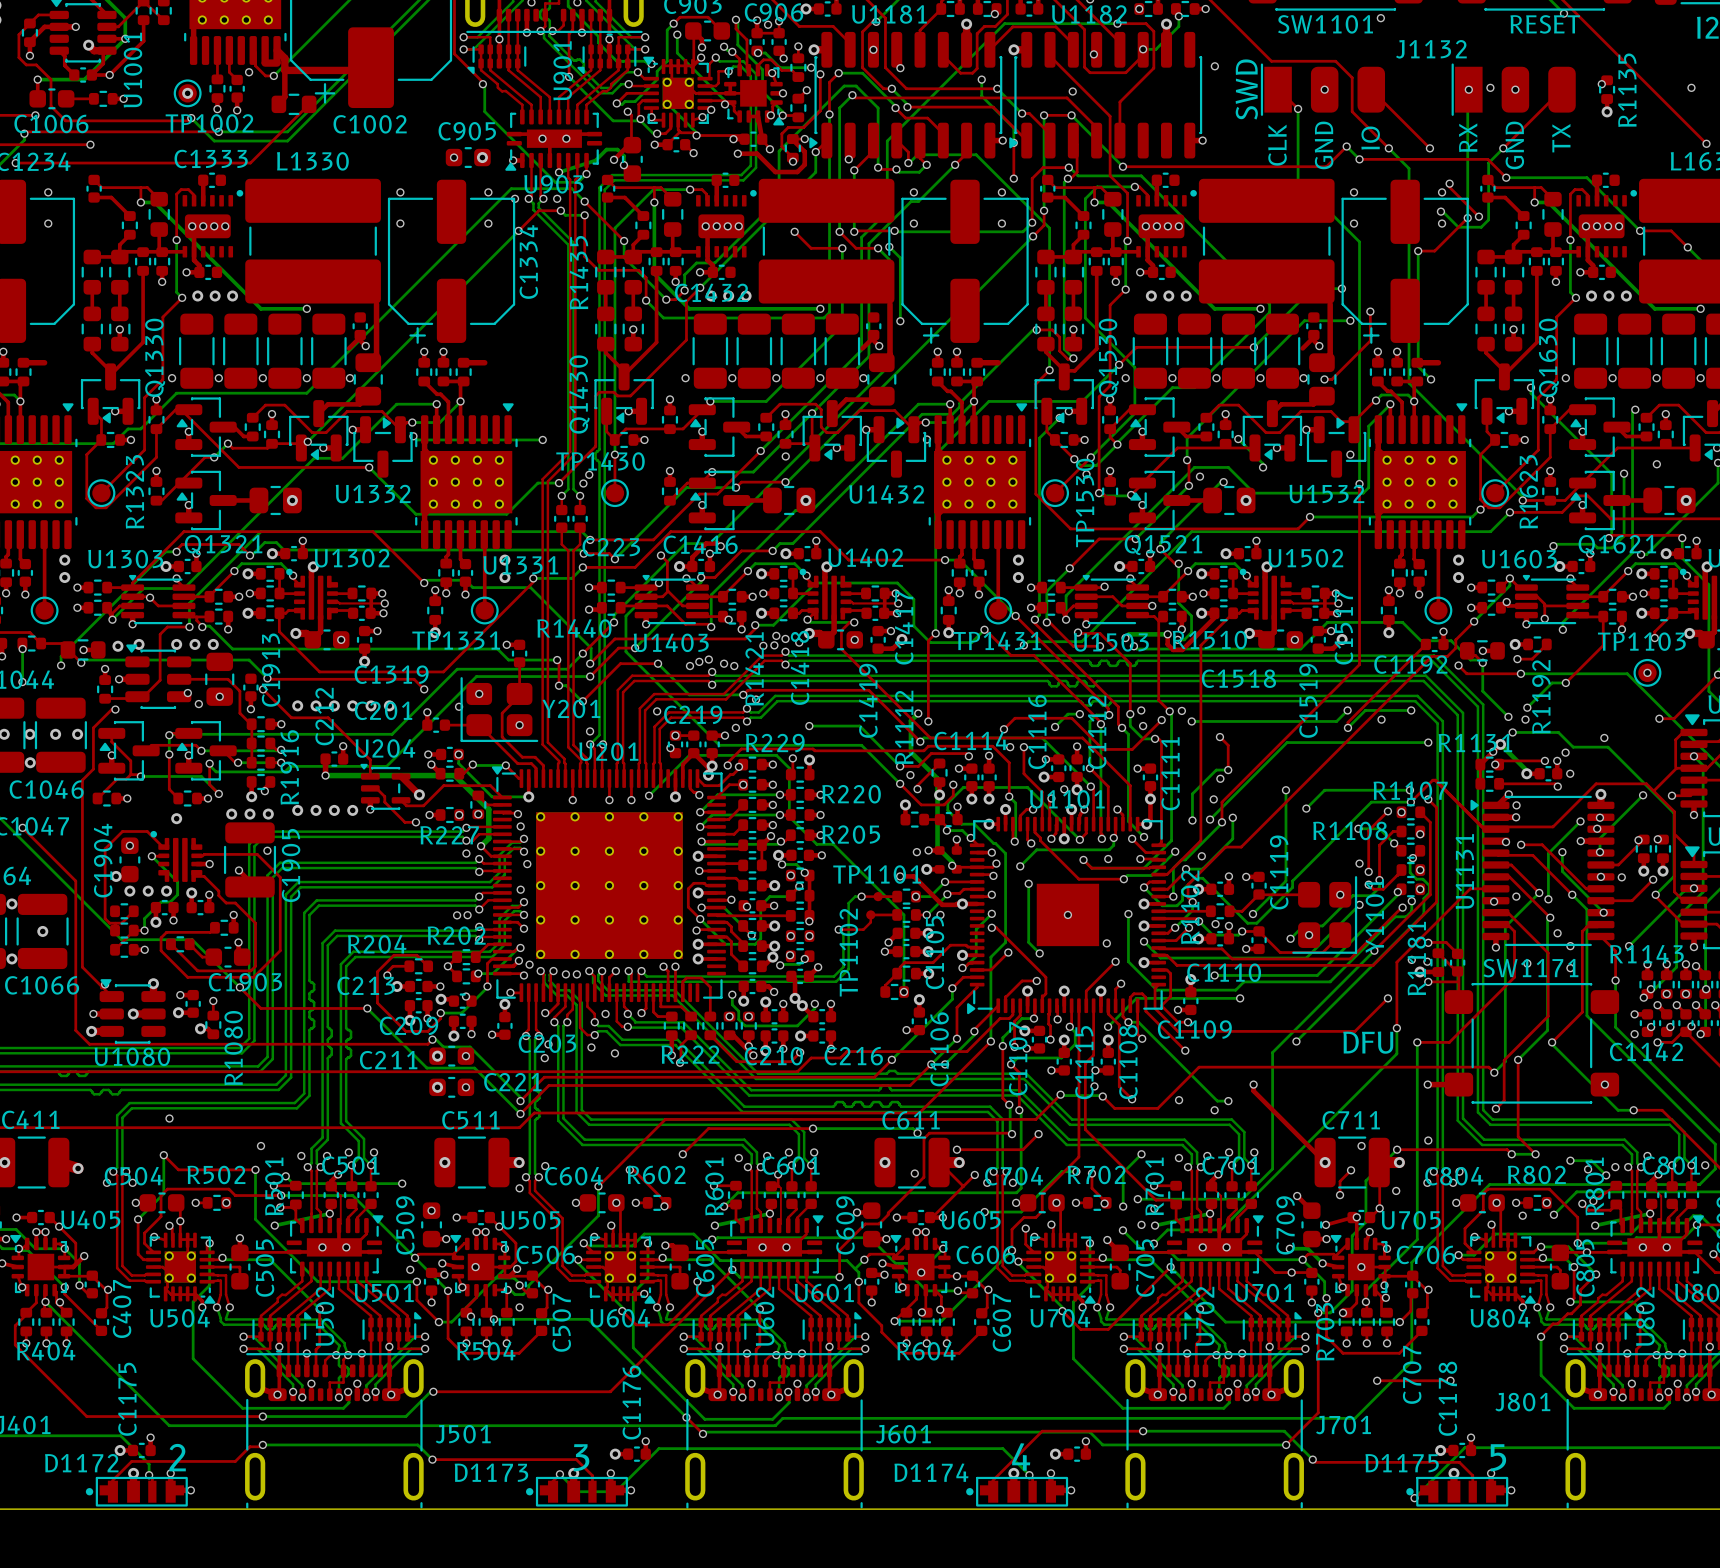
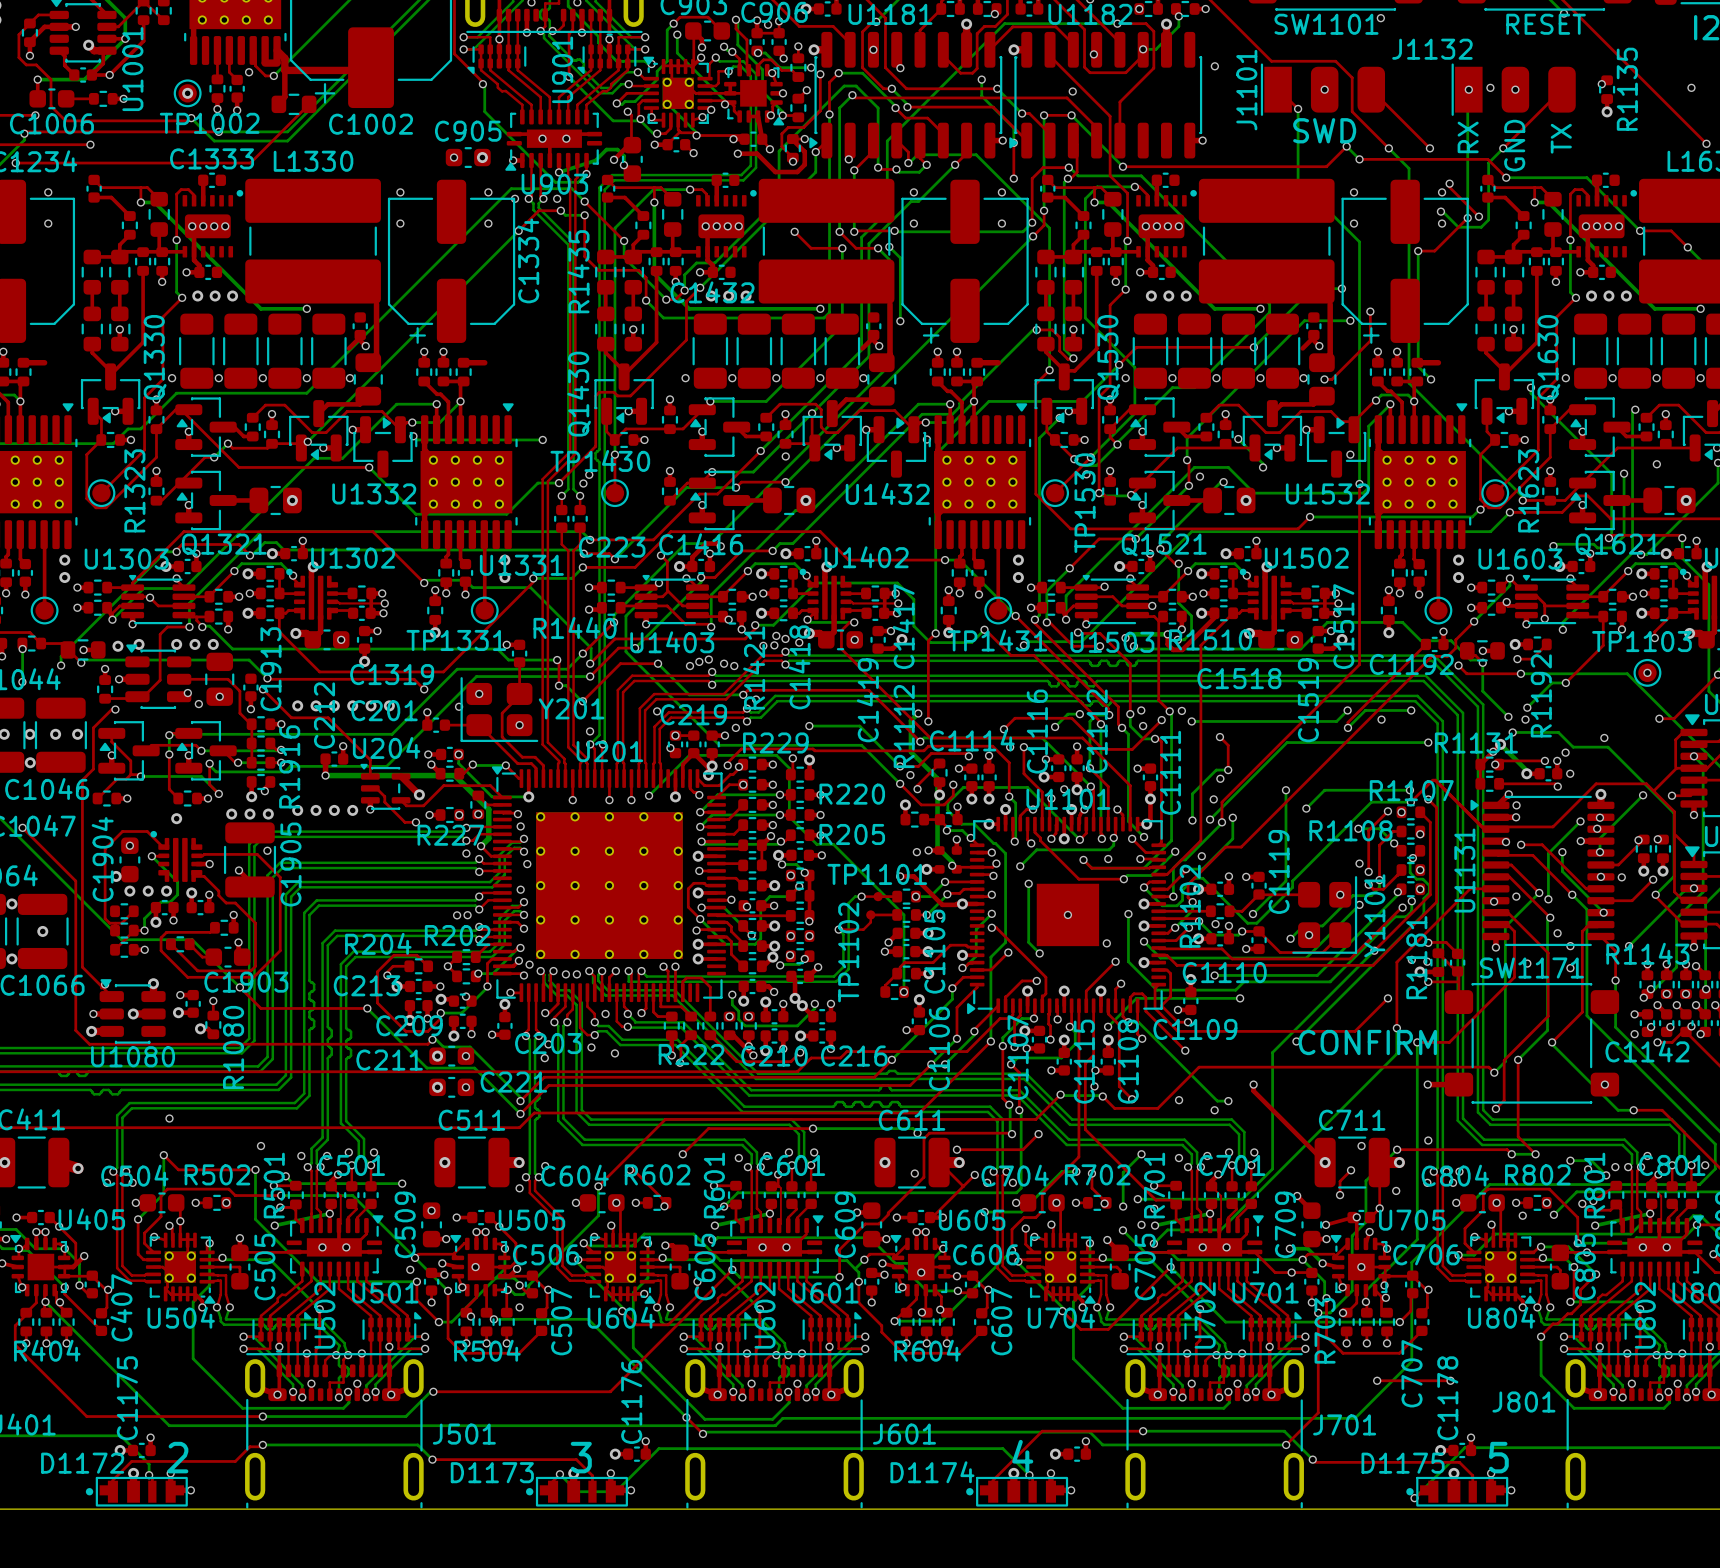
text rotation: 0° (1246, 89) -> 90° clockwise (1324, 130)
text position: SWD (1246, 89) -> SWD (1324, 130)
J1101 name: none -> J1101 (1246, 90)
text: IO (1370, 138) -> none
text: CLK (1277, 145) -> none
text: GND (1324, 145) -> none
text: DFU (1368, 1042) -> CONFIRM (1367, 1042)

